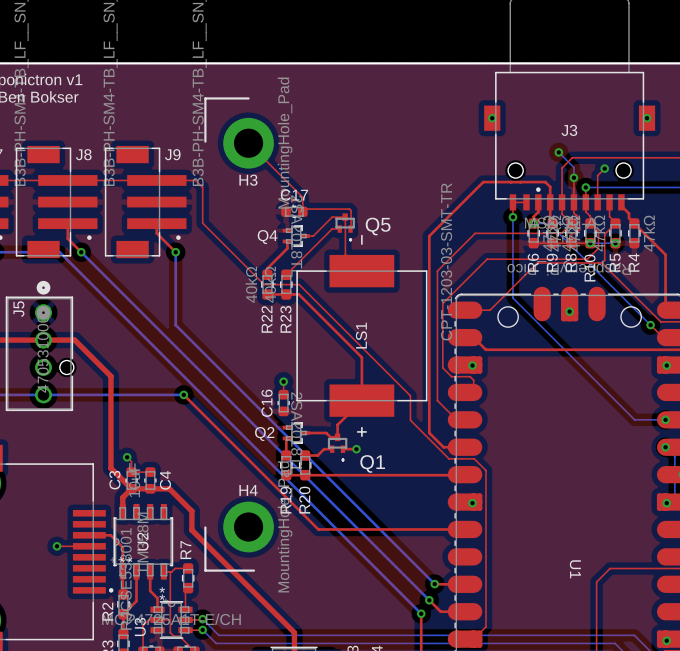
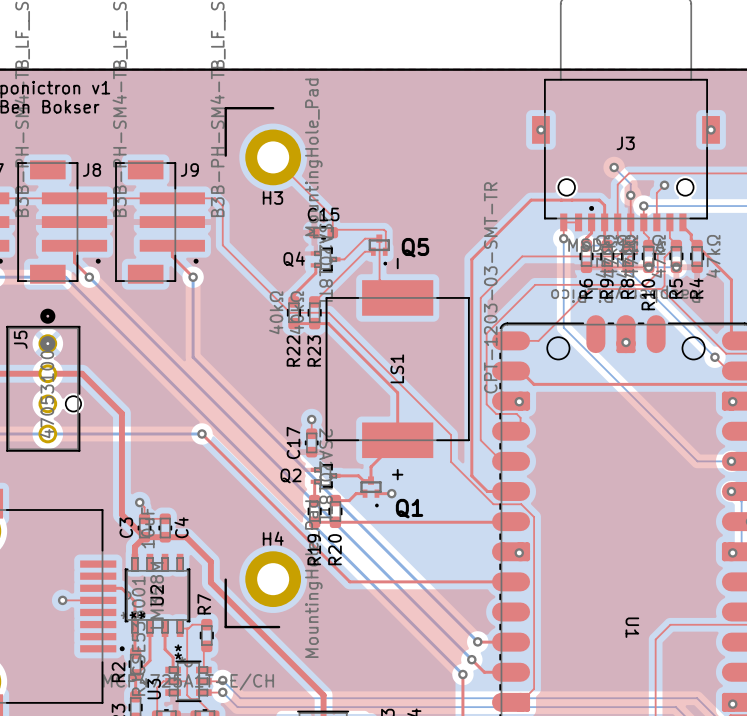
C17 name: C17 (294, 195) -> C15 (323, 214)
C16 name: C16 (267, 403) -> C17 (293, 442)

